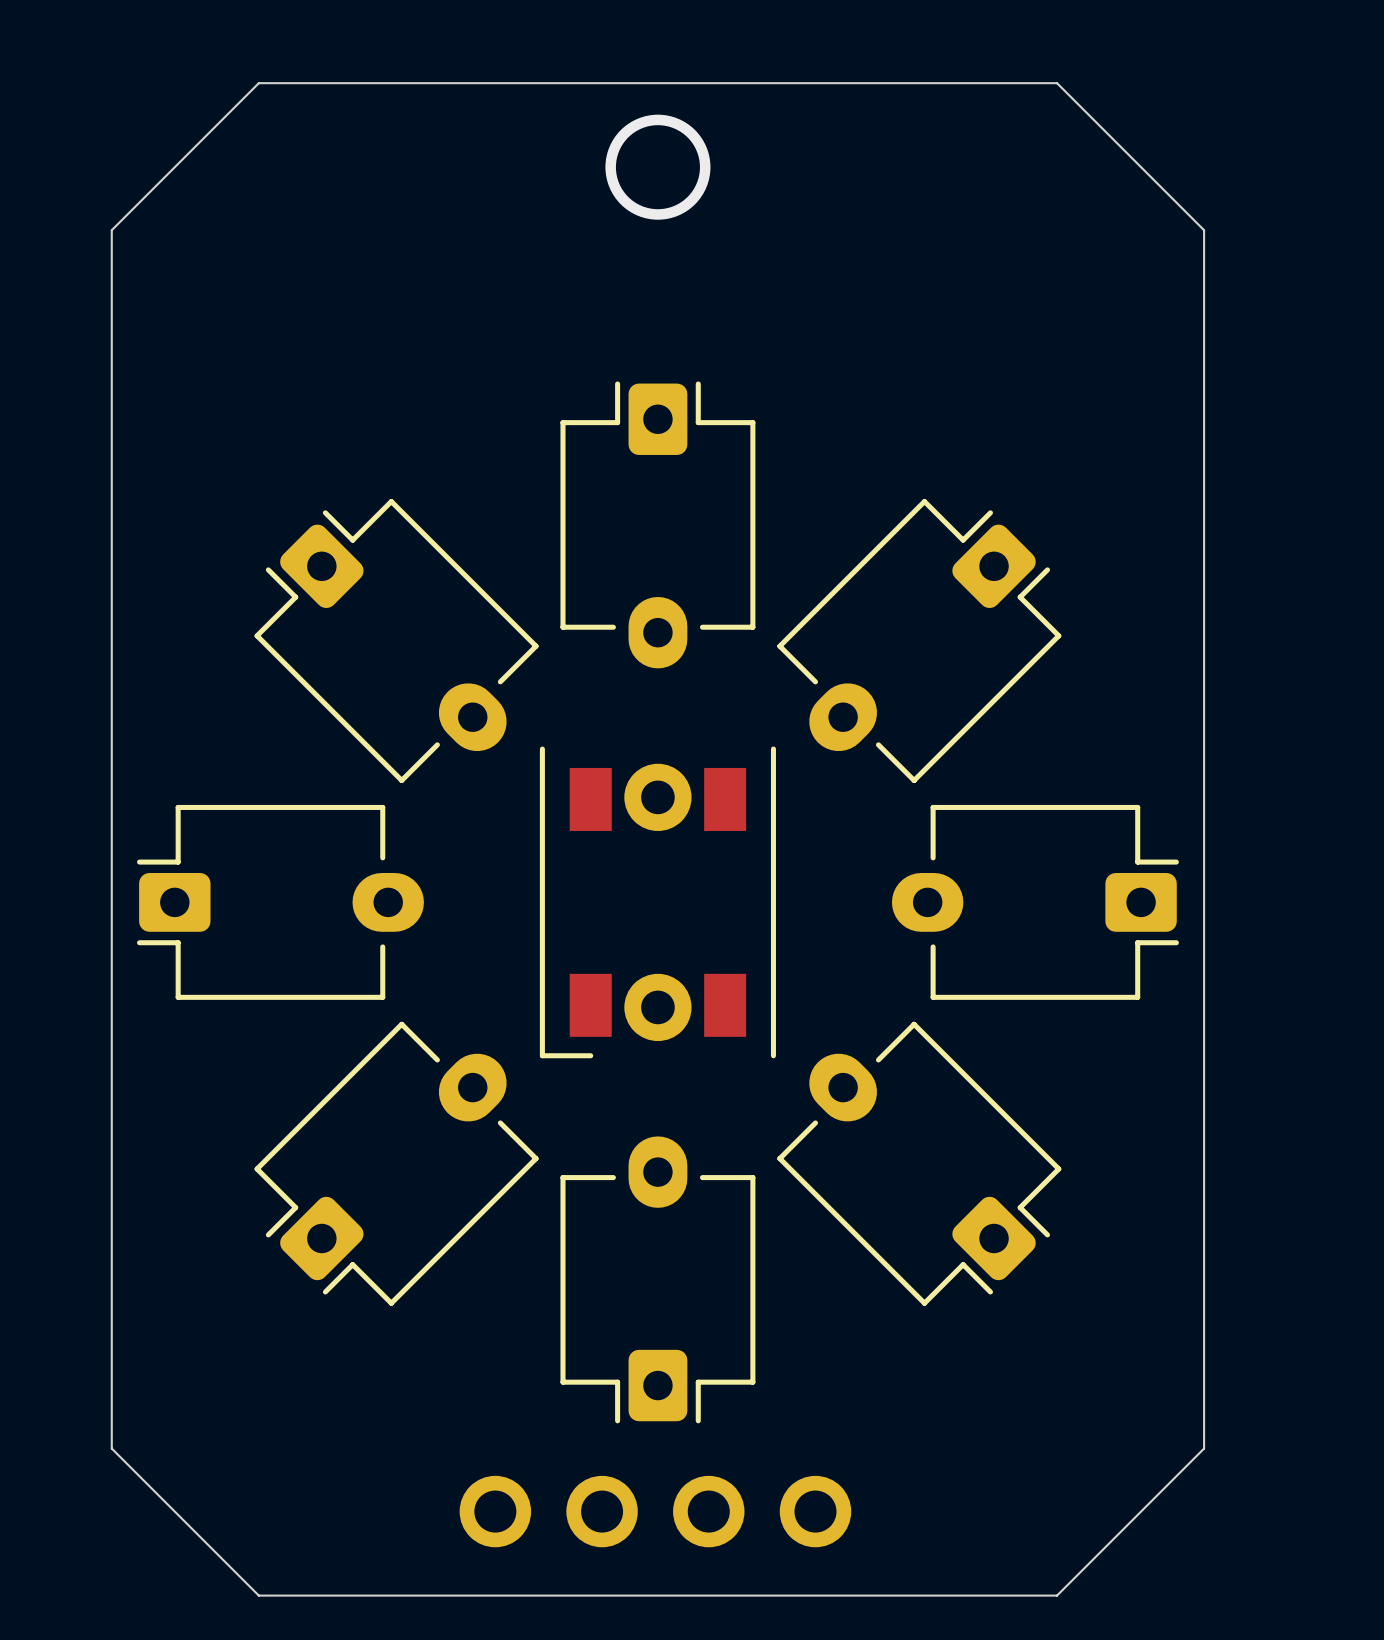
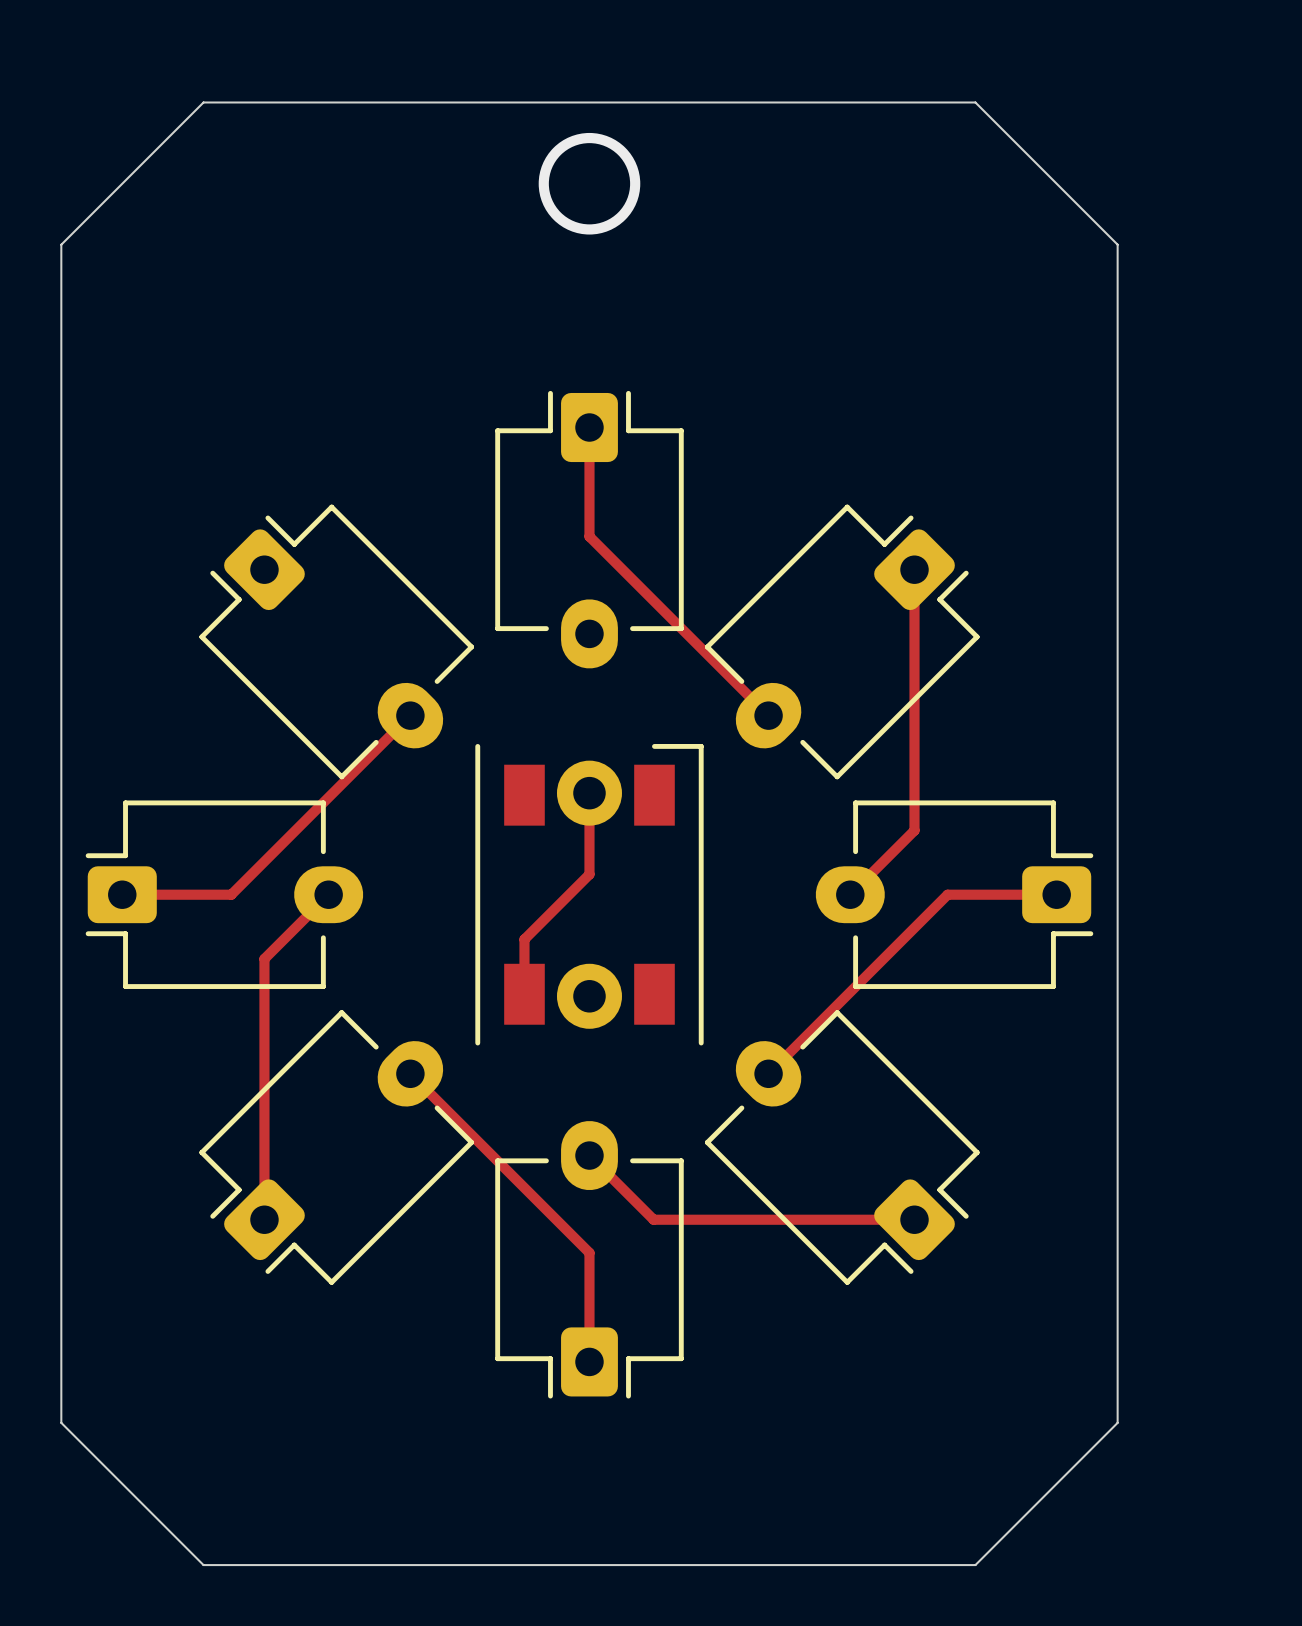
track: none -> (589, 427) (589, 536) (768, 715)
track: none -> (914, 569) (914, 830) (850, 894)
track: none -> (410, 715) (231, 894) (122, 894)
track: none -> (589, 793) (589, 874) (524, 939) (524, 994) (526, 996)
track: none -> (328, 894) (264, 958) (264, 1219)
part rotation: 0° (657, 902) -> 180° (589, 894)
track: none -> (1056, 894) (947, 894) (768, 1073)
track: none -> (410, 1073) (589, 1252) (589, 1361)
track: none -> (589, 1155) (653, 1219) (914, 1219)
part: (655, 1511) -> none

